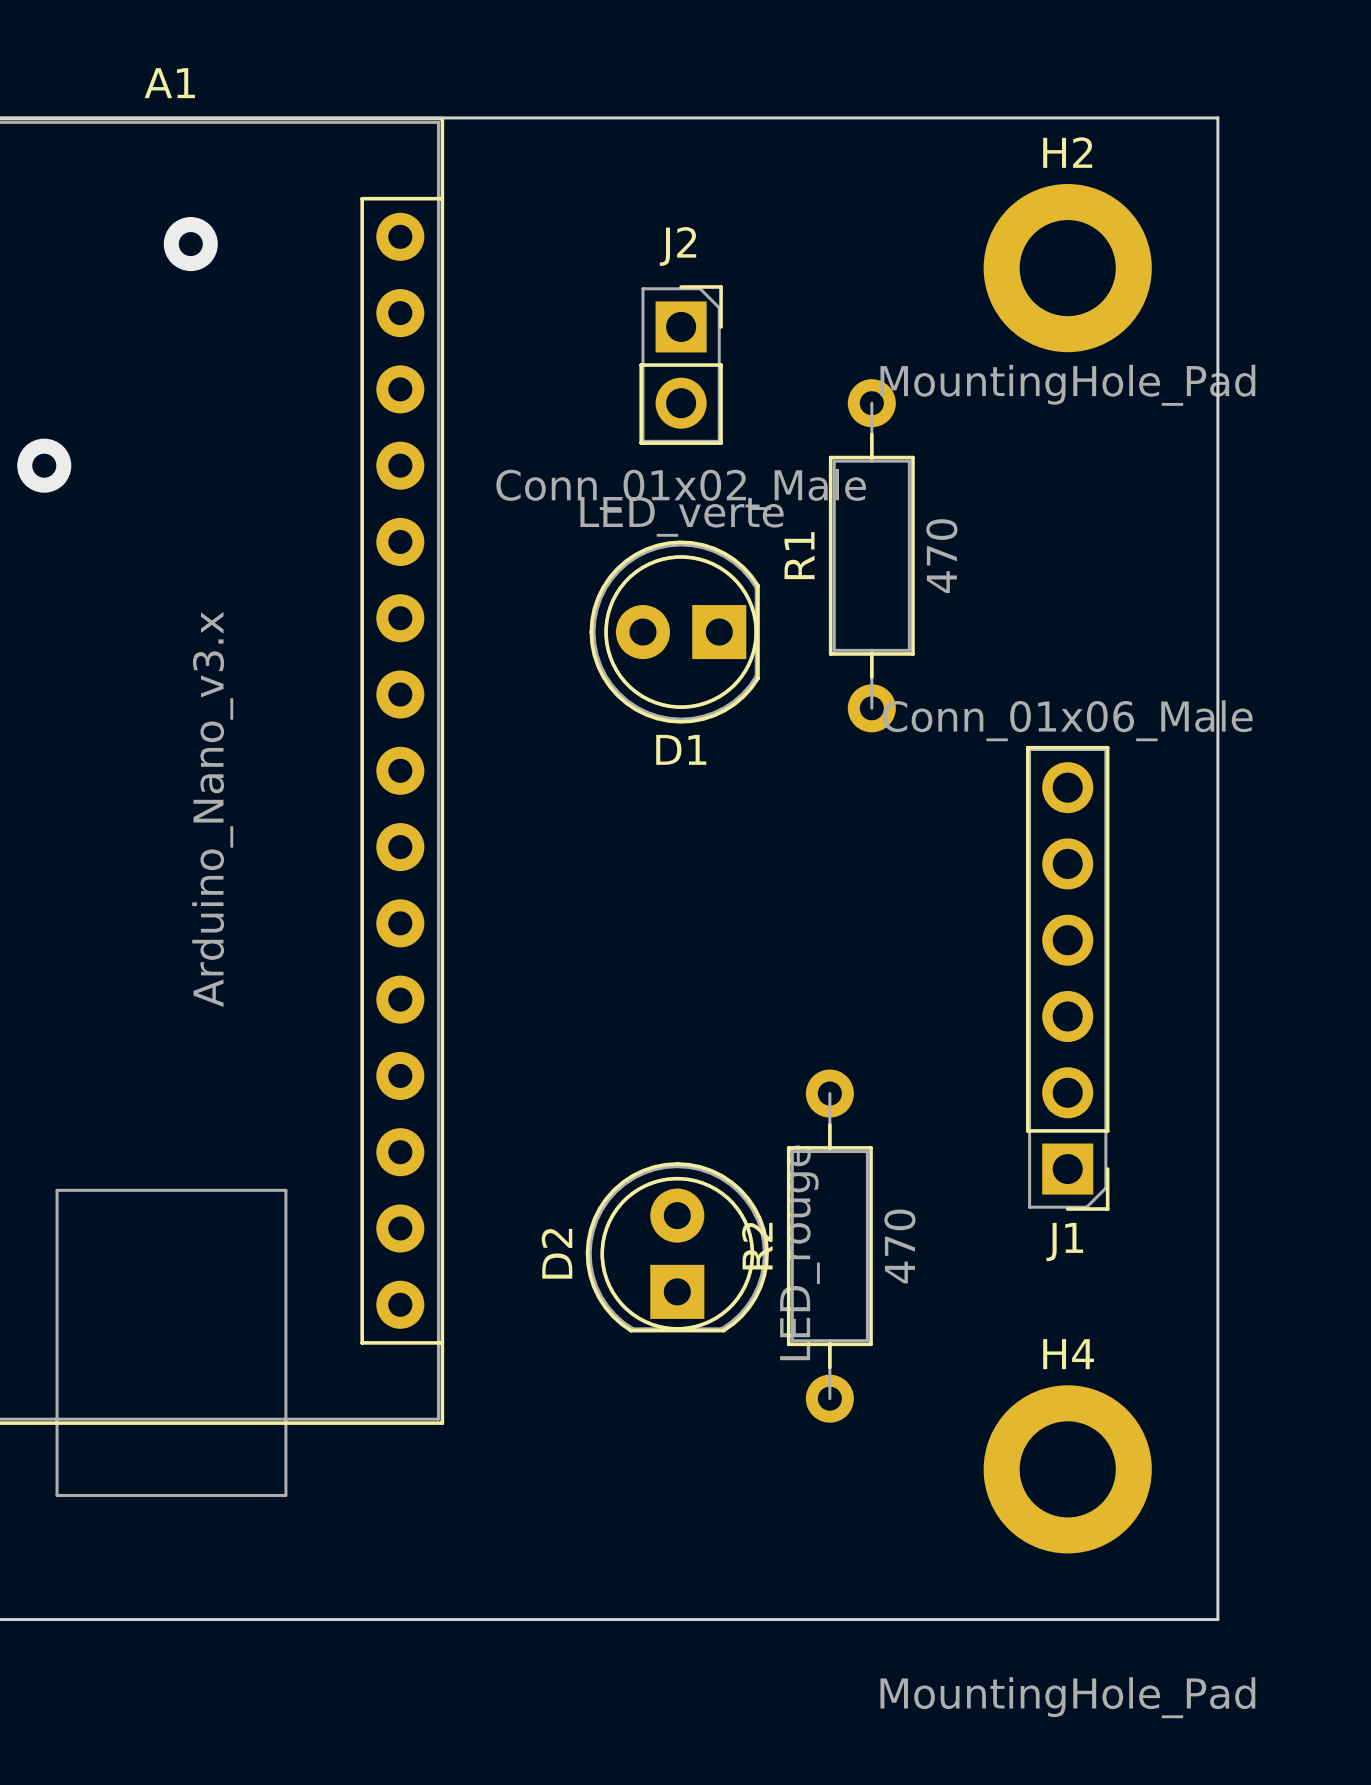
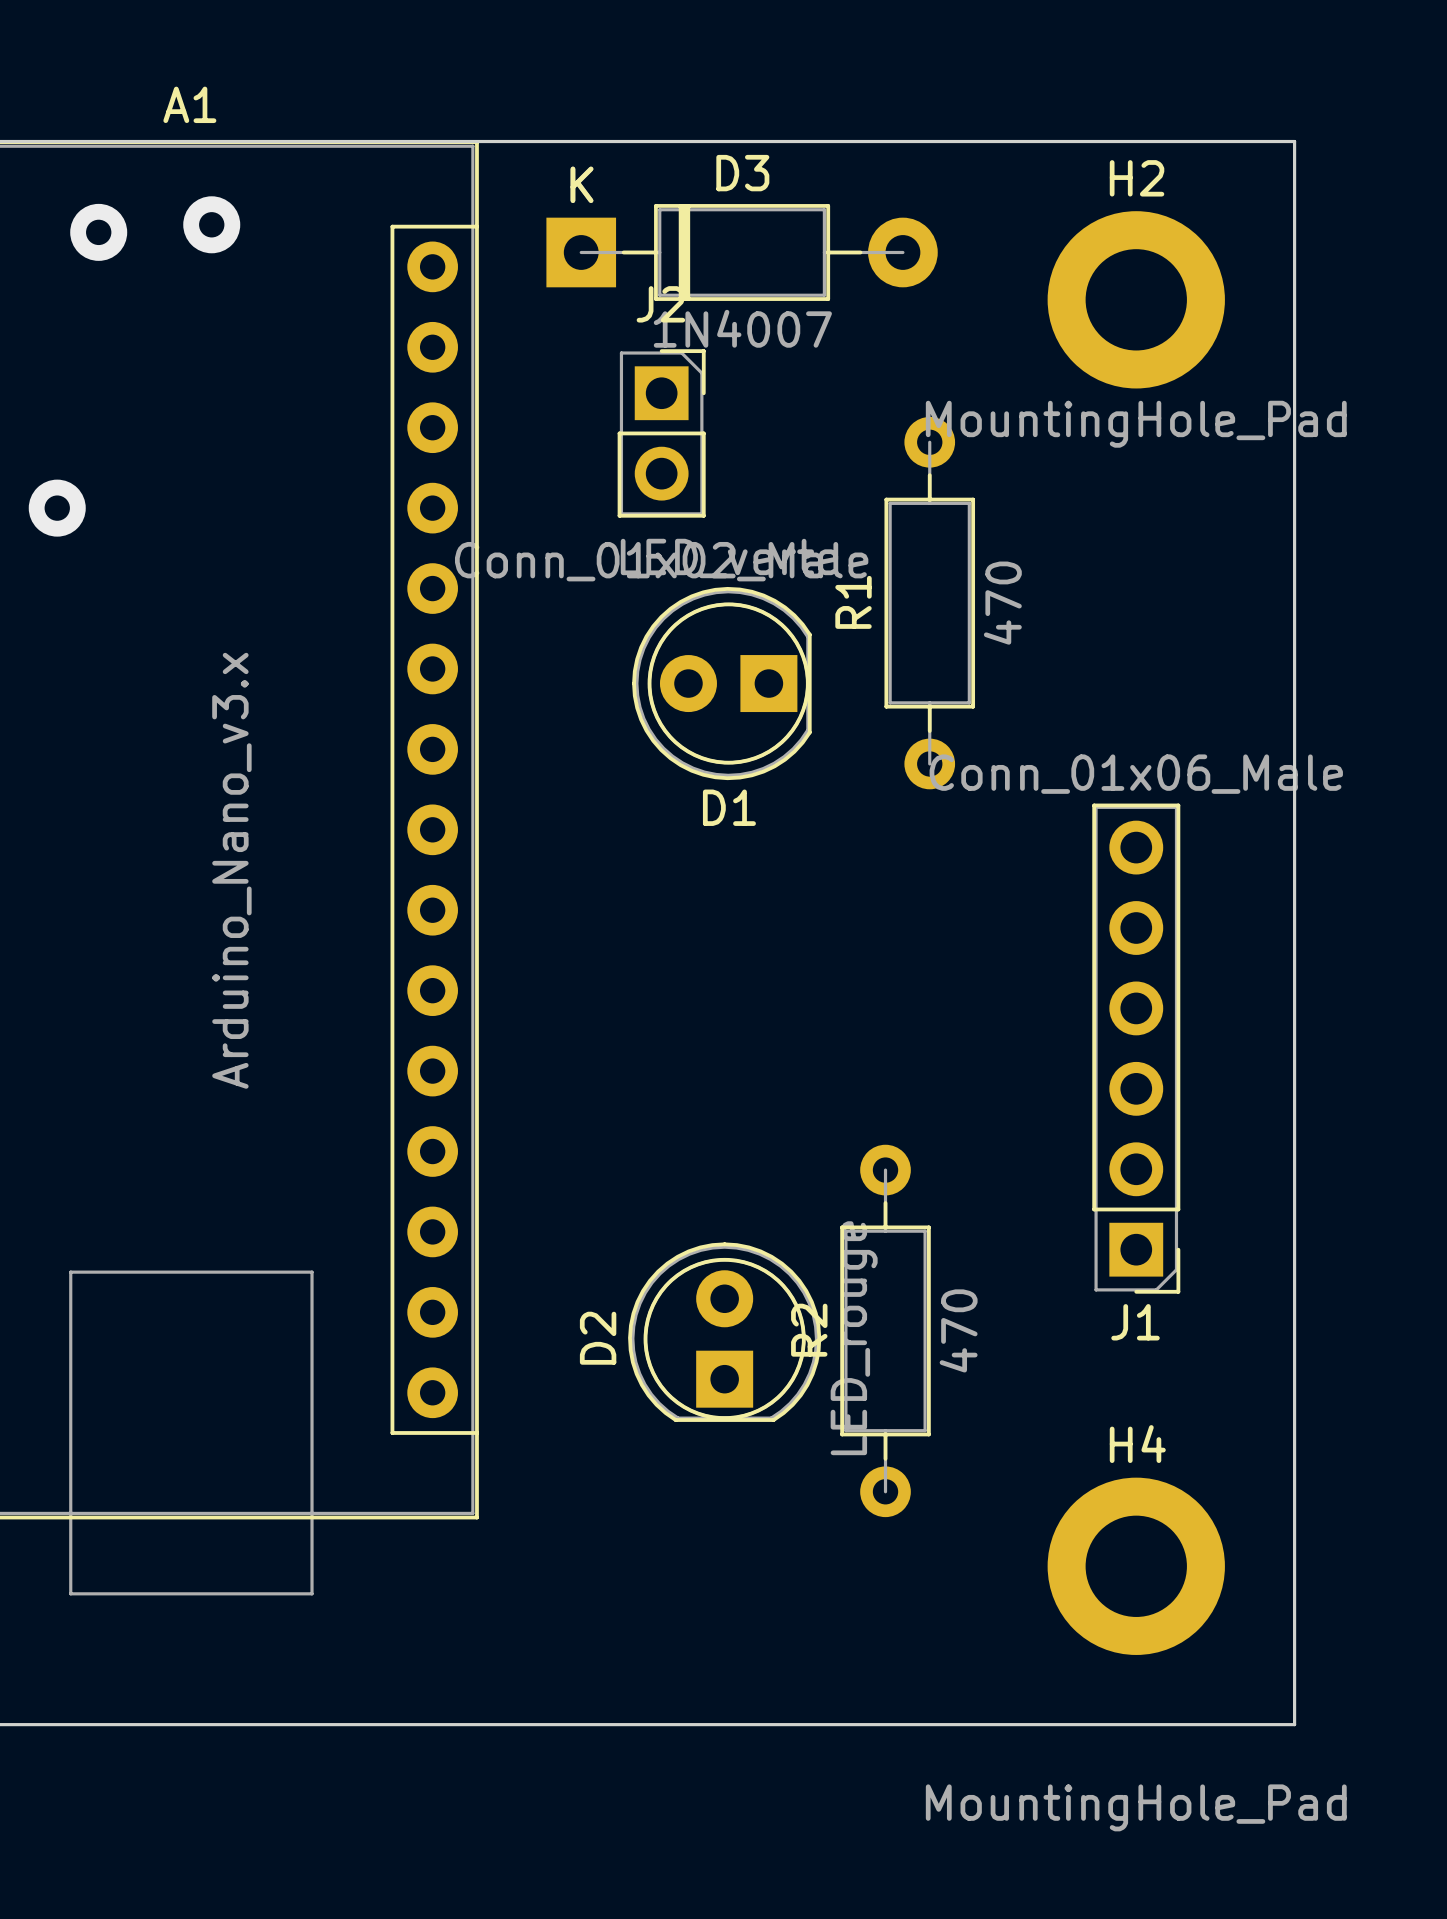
via: none -> (98, 232)
D3: none -> 1N4007 (742, 252)
via position: (190, 244) -> (211, 224)
J2 position: (681, 365) -> (661, 433)

